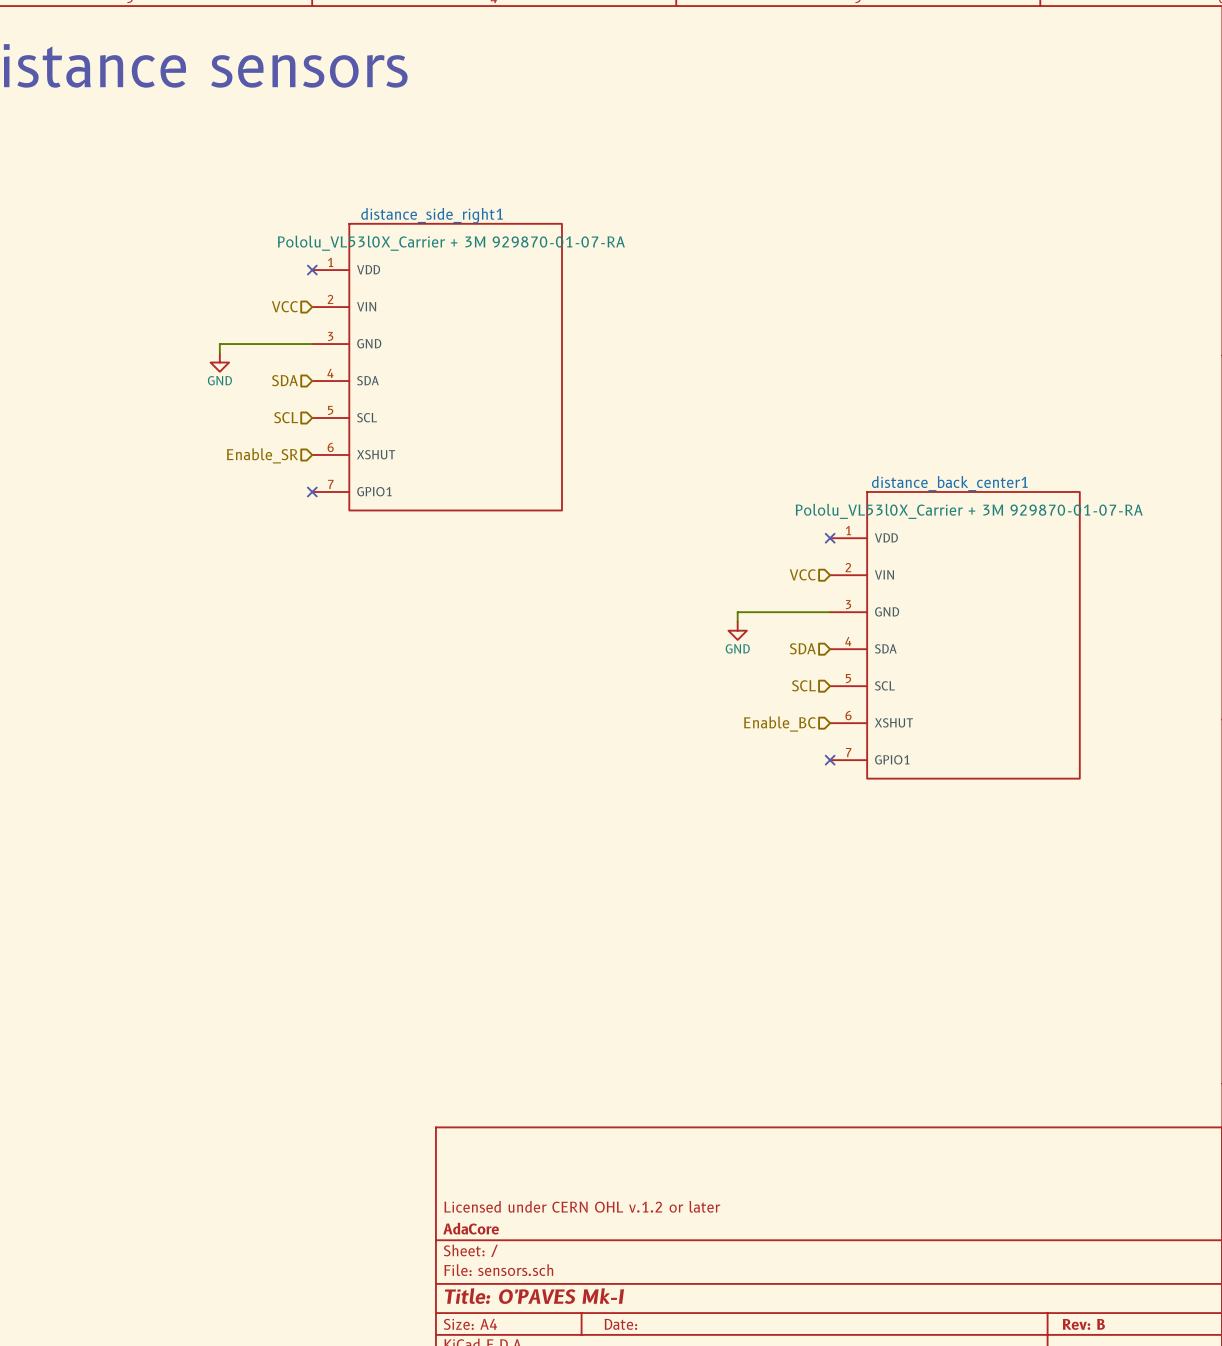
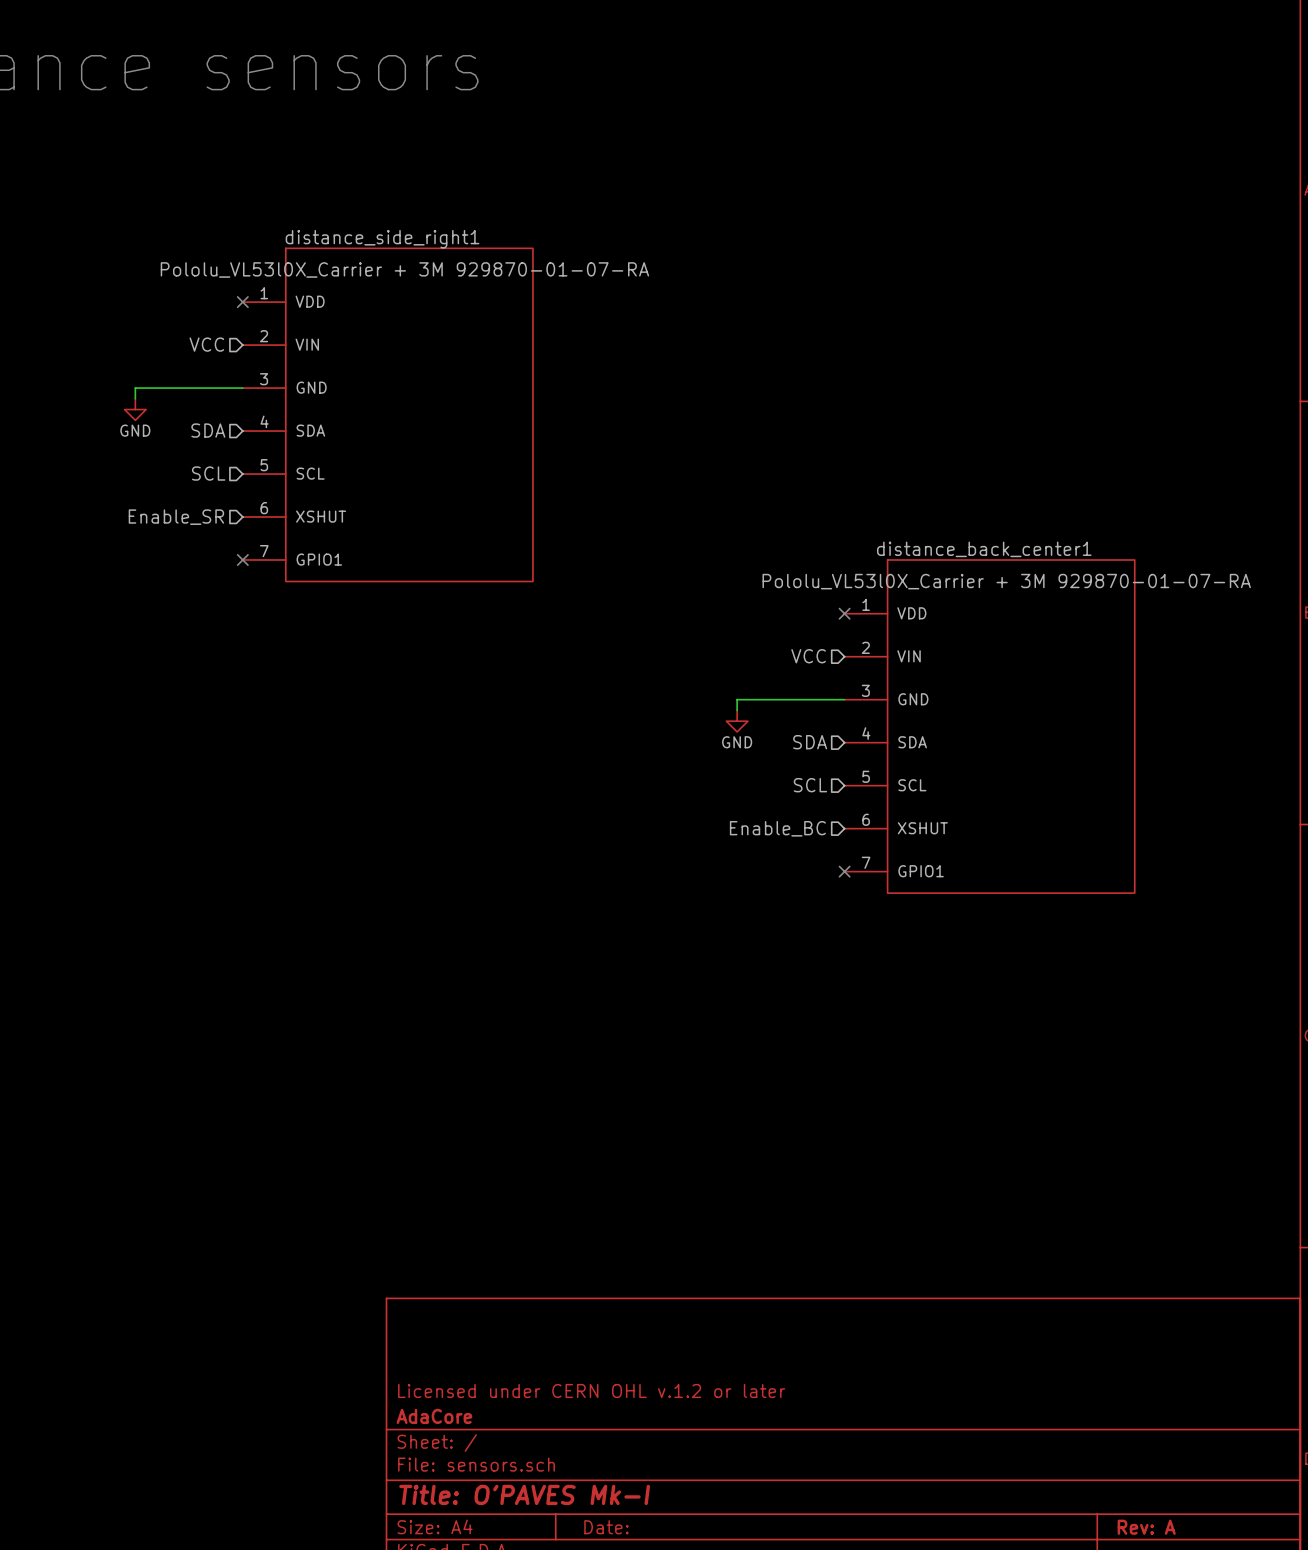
title block: Rev: B (1083, 1324) -> Rev: A (1146, 1527)

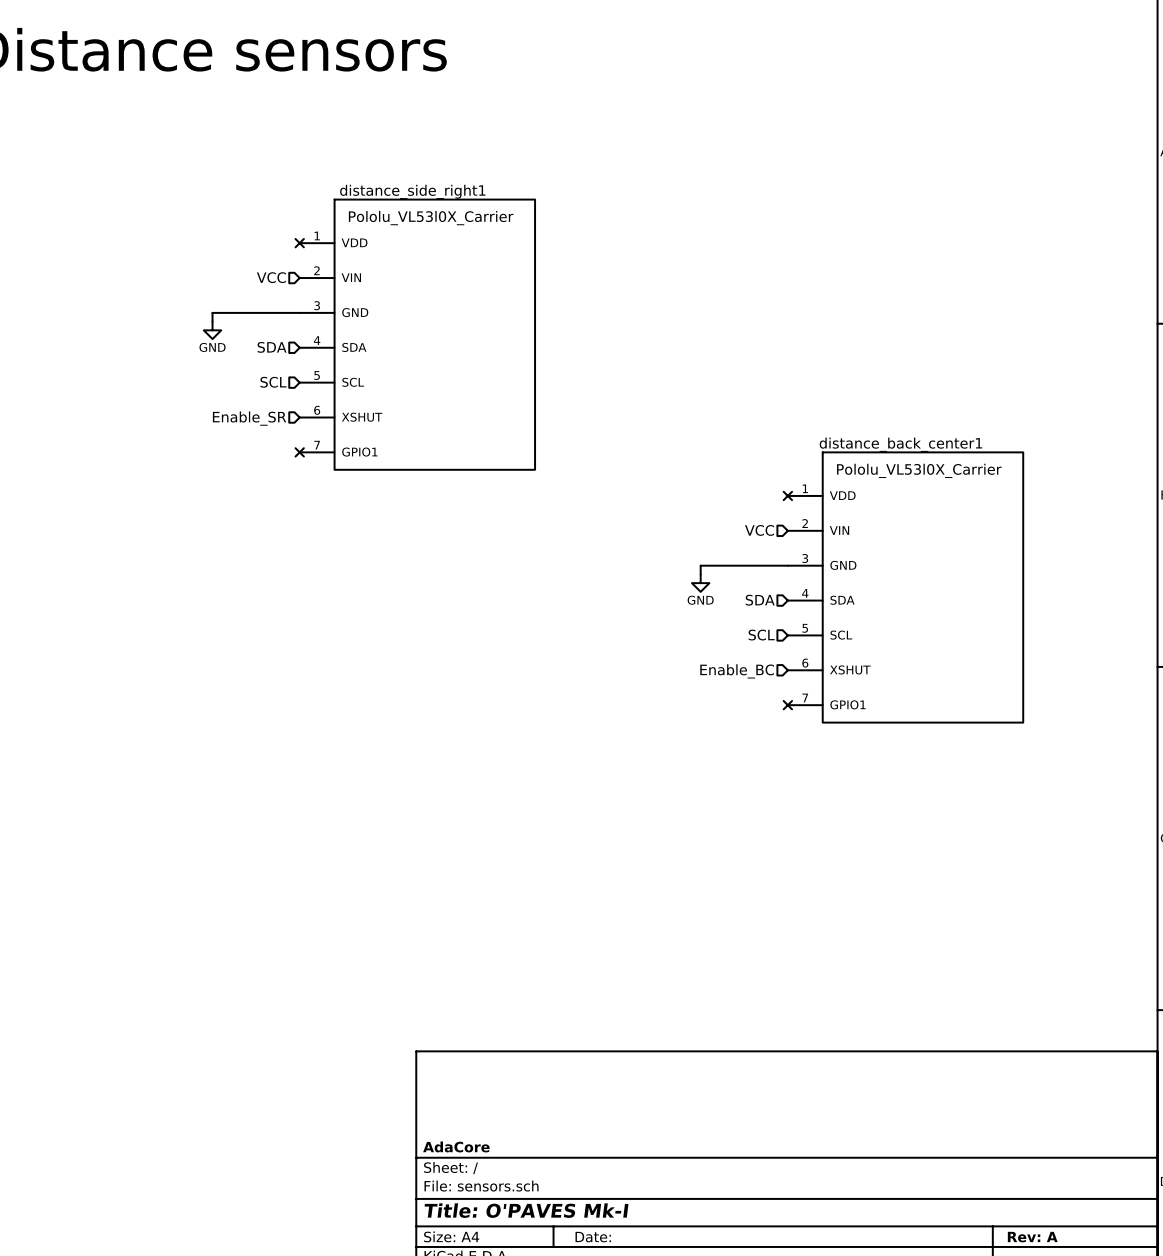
distance_side_right1 value: Pololu_VL53l0X_Carrier + 3M 929870-01-07-RA (404, 269) -> Pololu_VL53l0X_Carrier (431, 218)
distance_back_center1 value: Pololu_VL53l0X_Carrier + 3M 929870-01-07-RA (1006, 581) -> Pololu_VL53l0X_Carrier (919, 470)
title block: Licensed under CERN OHL v.1.2 or later (591, 1391) -> none

